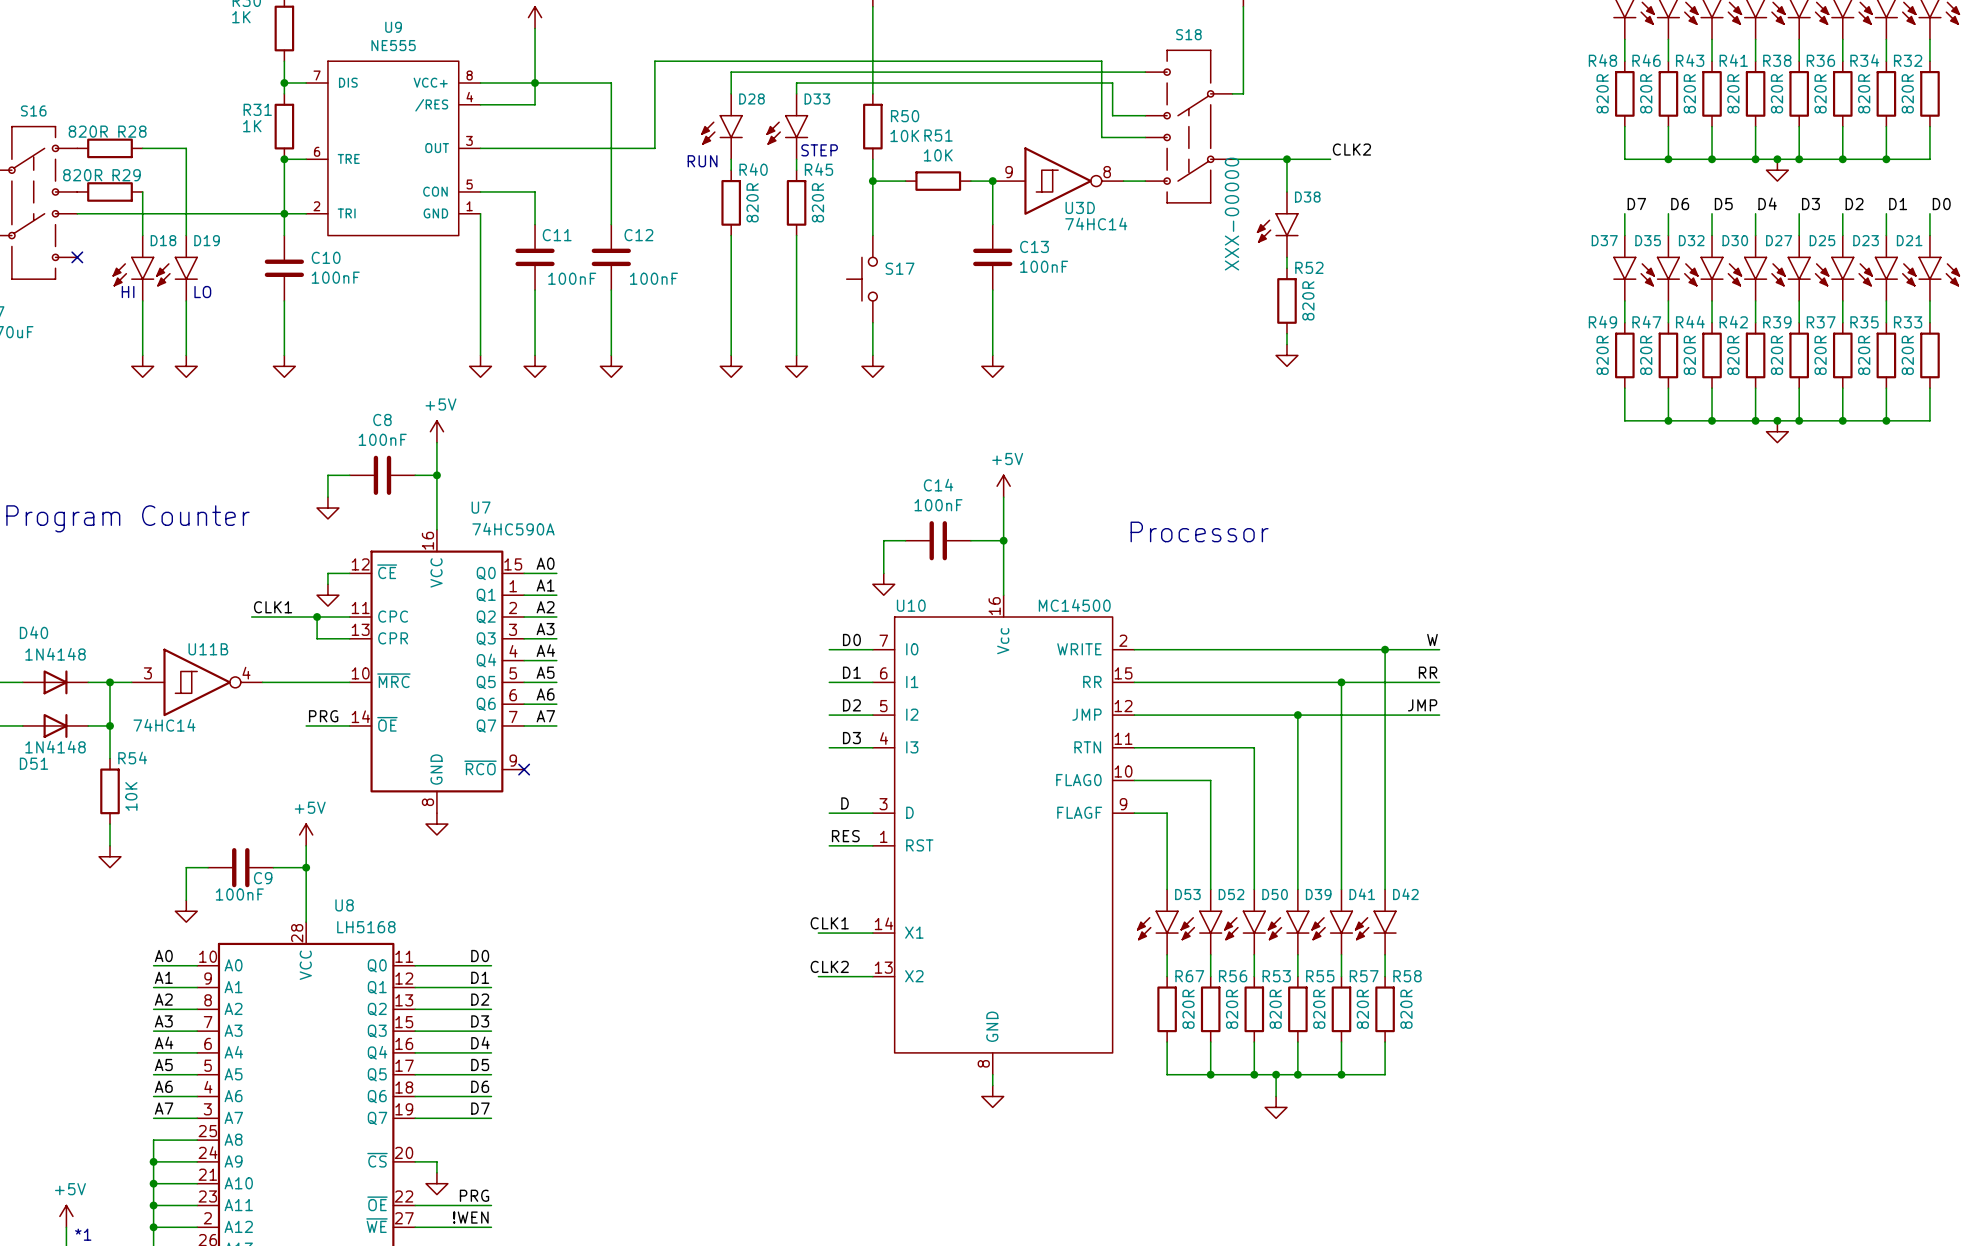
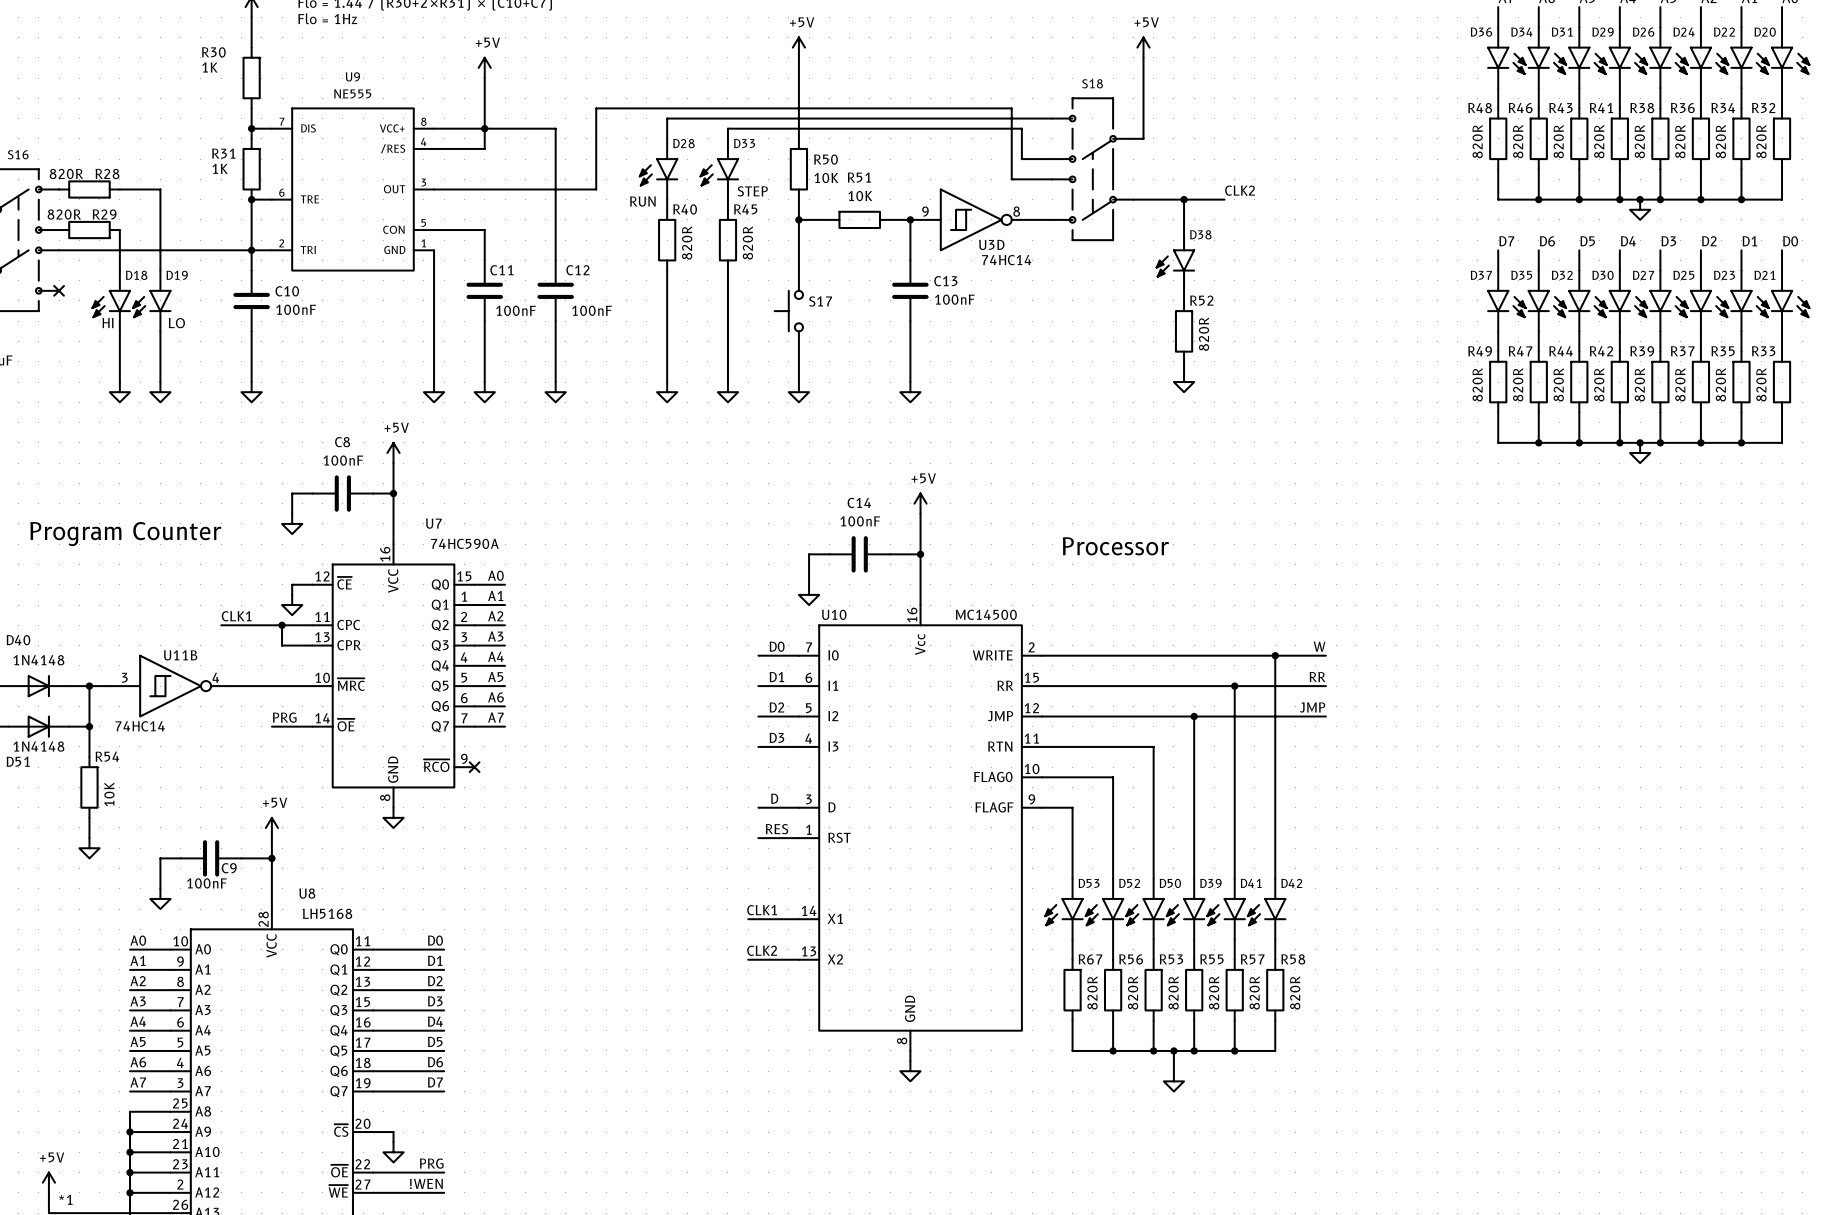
D38 text: XXX-00000 (1232, 214) -> none

